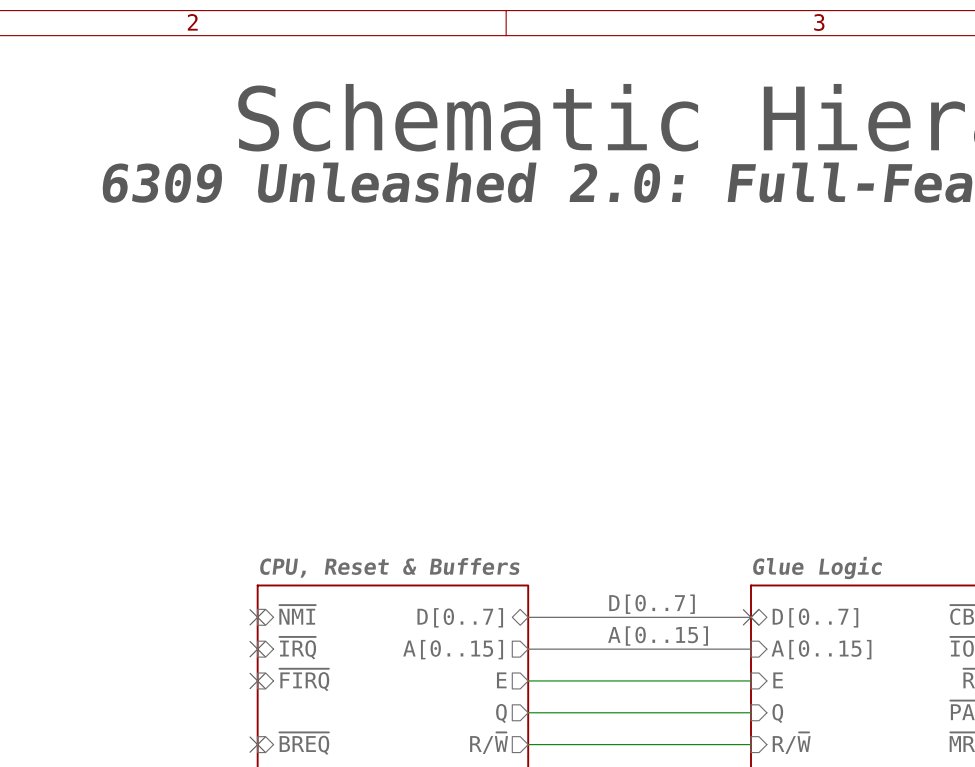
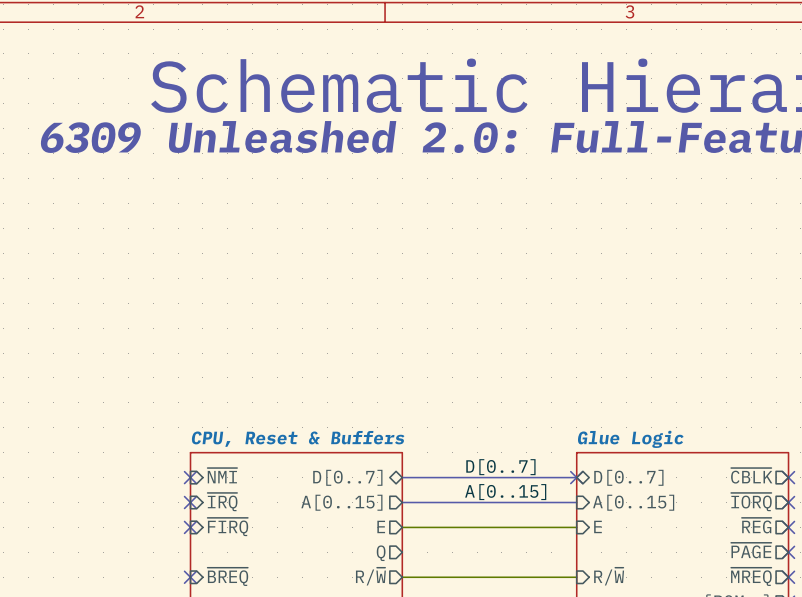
wire: (528, 712) (751, 712) -> none
sheet pin: Q (777, 713) -> none

